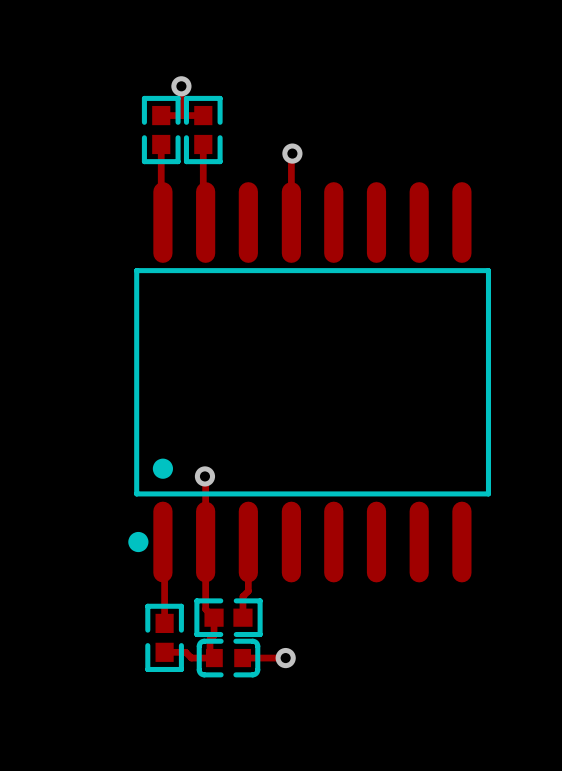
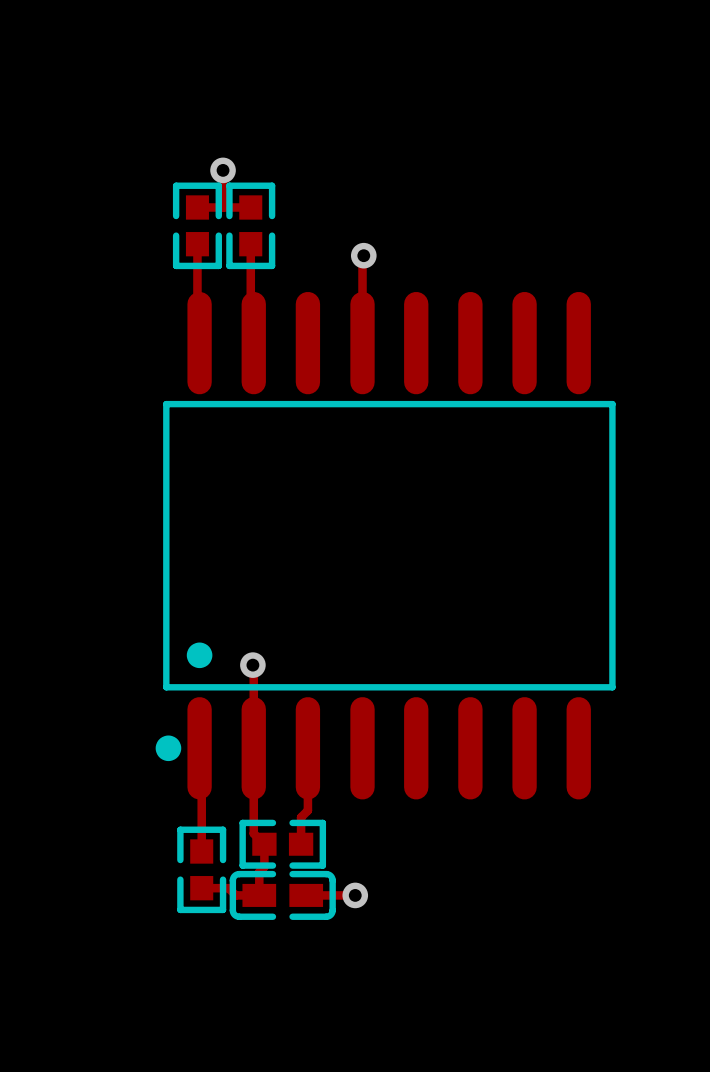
part footprint: [196, 638, 261, 678] -> [229, 870, 336, 920]

